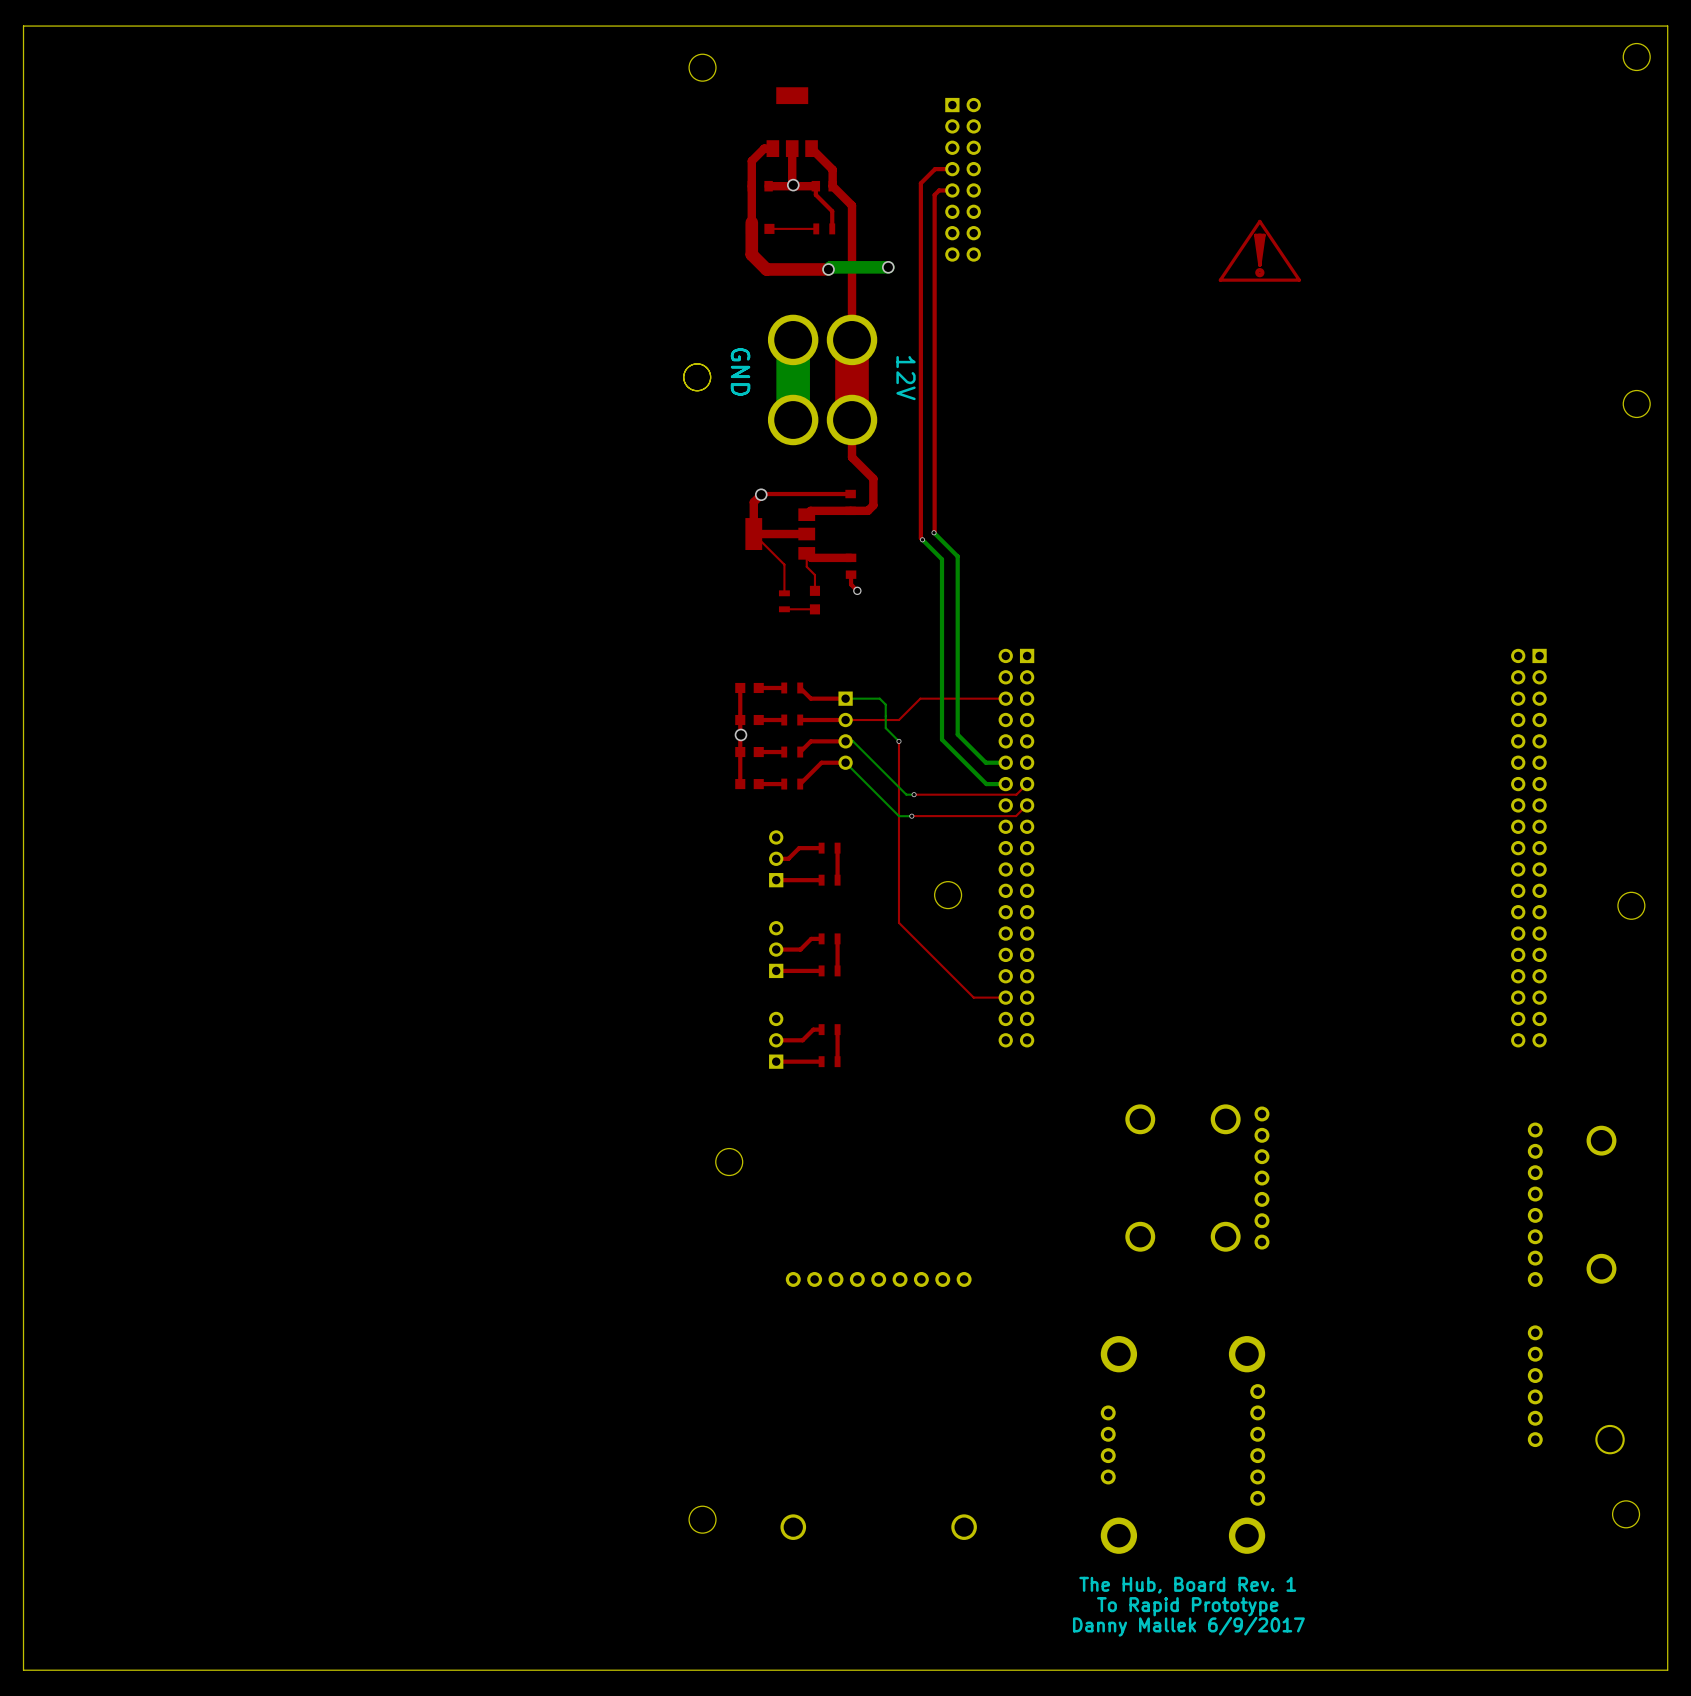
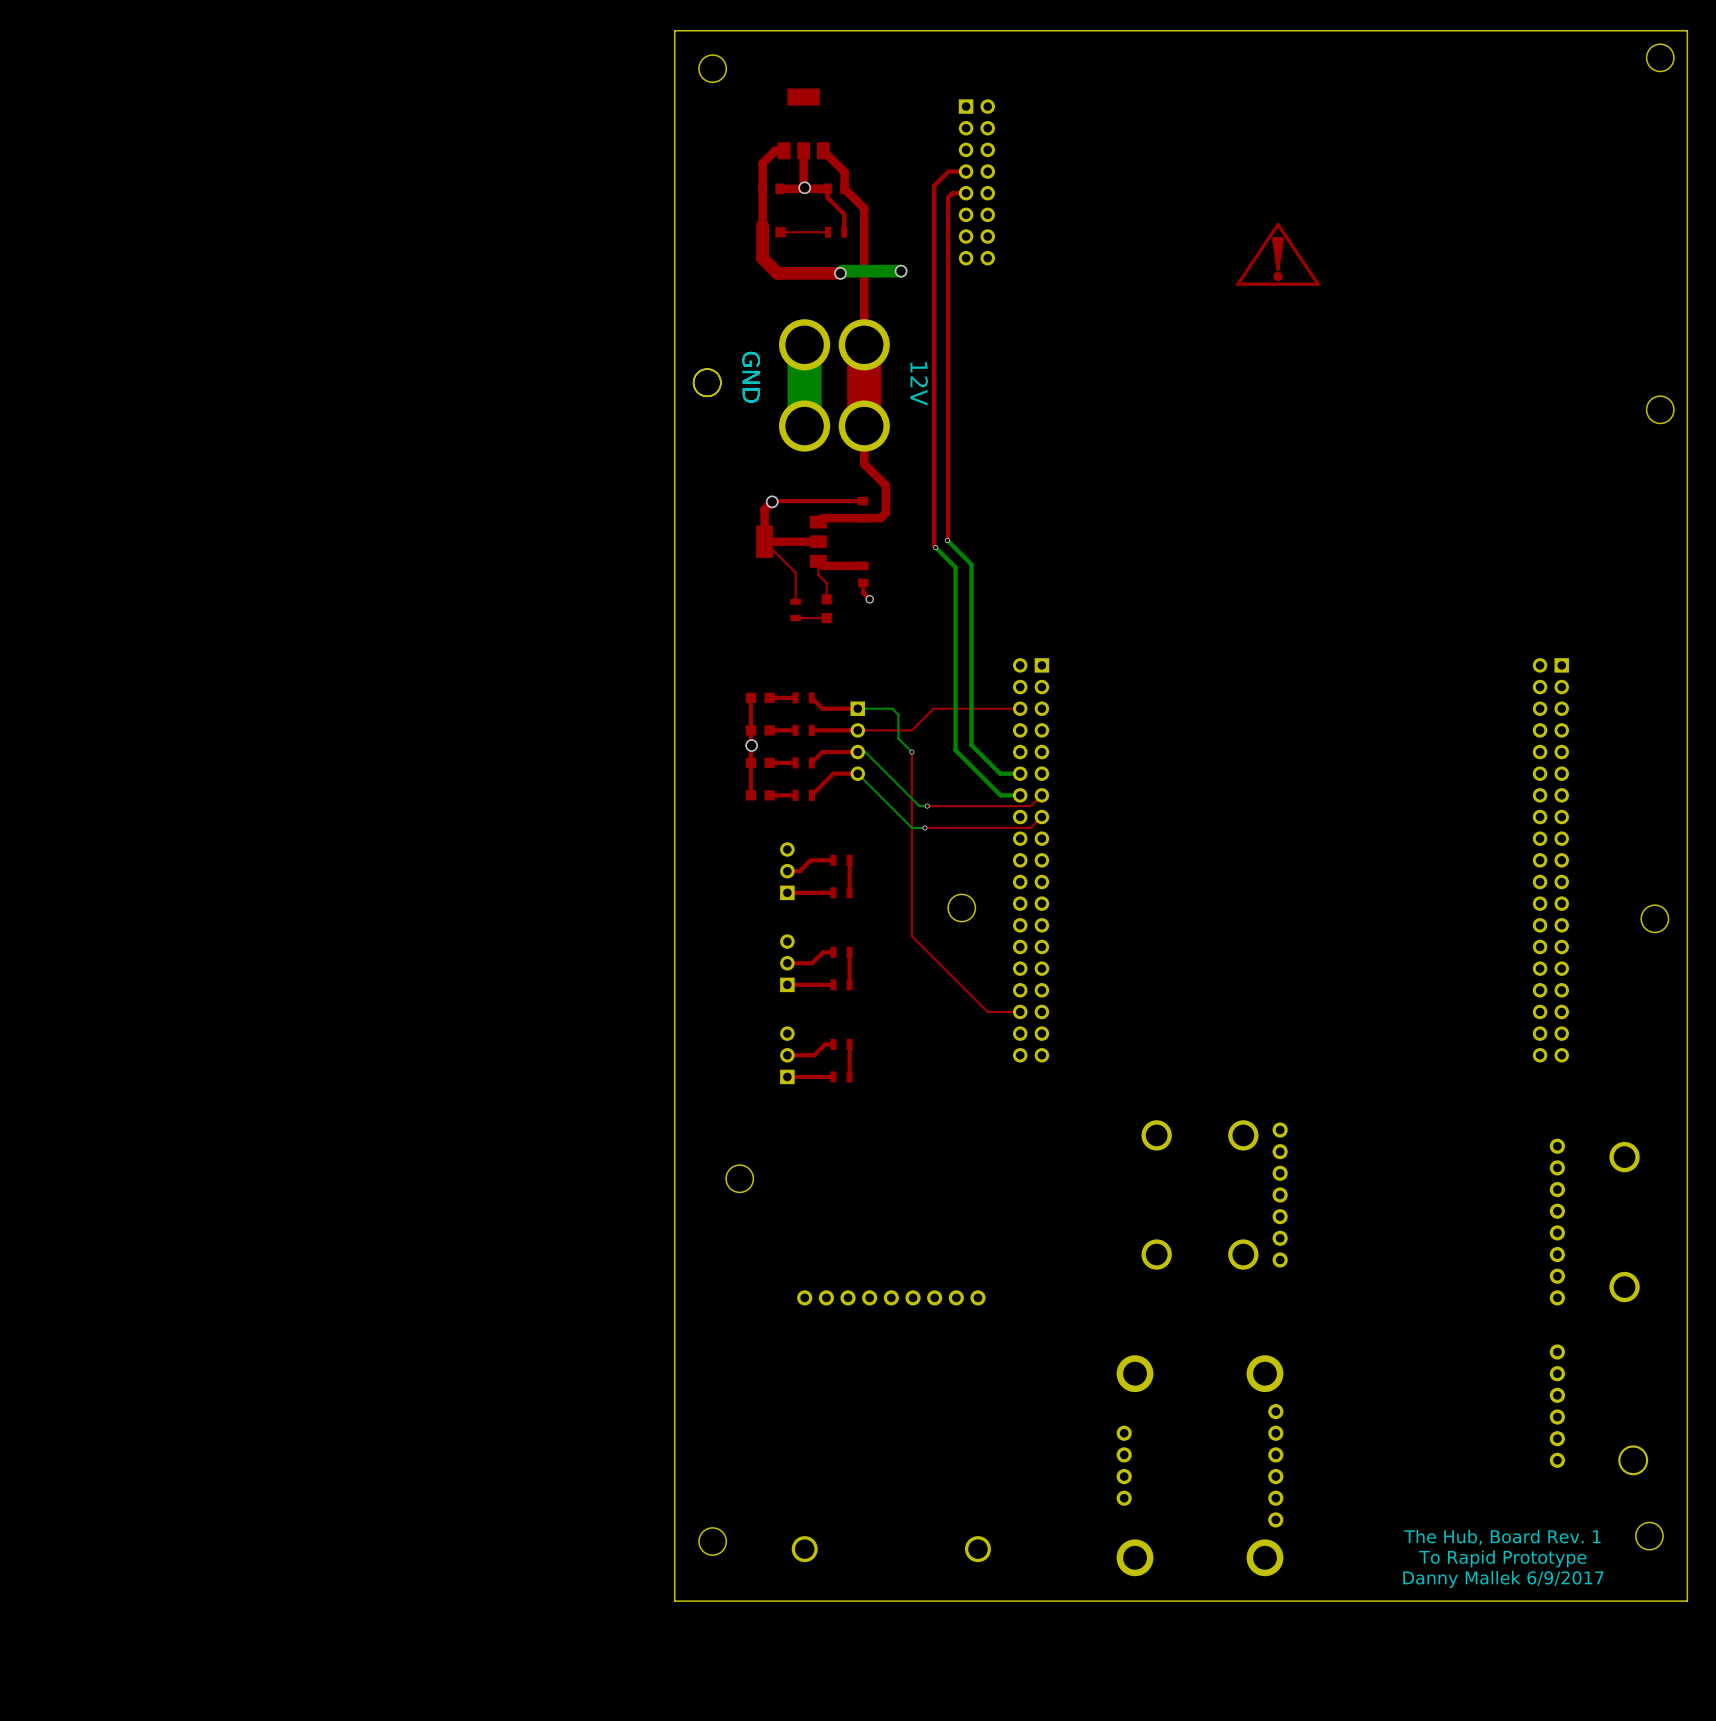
board edge: (1667, 26) (1667, 1670) (23, 1670) (23, 26) (1667, 26) -> (1687, 30) (1687, 1601) (674, 1601) (674, 30) (1687, 30)
text: none -> The Hub, Board Rev. 1 (1502, 1537)
text: none -> To Rapid Prototype (1502, 1558)
text: none -> Danny Mallek 6/9/2017 (1503, 1579)
text: The Hub, Board Rev. 1 (1187, 1585) -> none
text: To Rapid Prototype (1187, 1606) -> none
text: Danny Mallek 6/9/2017 (1188, 1626) -> none

